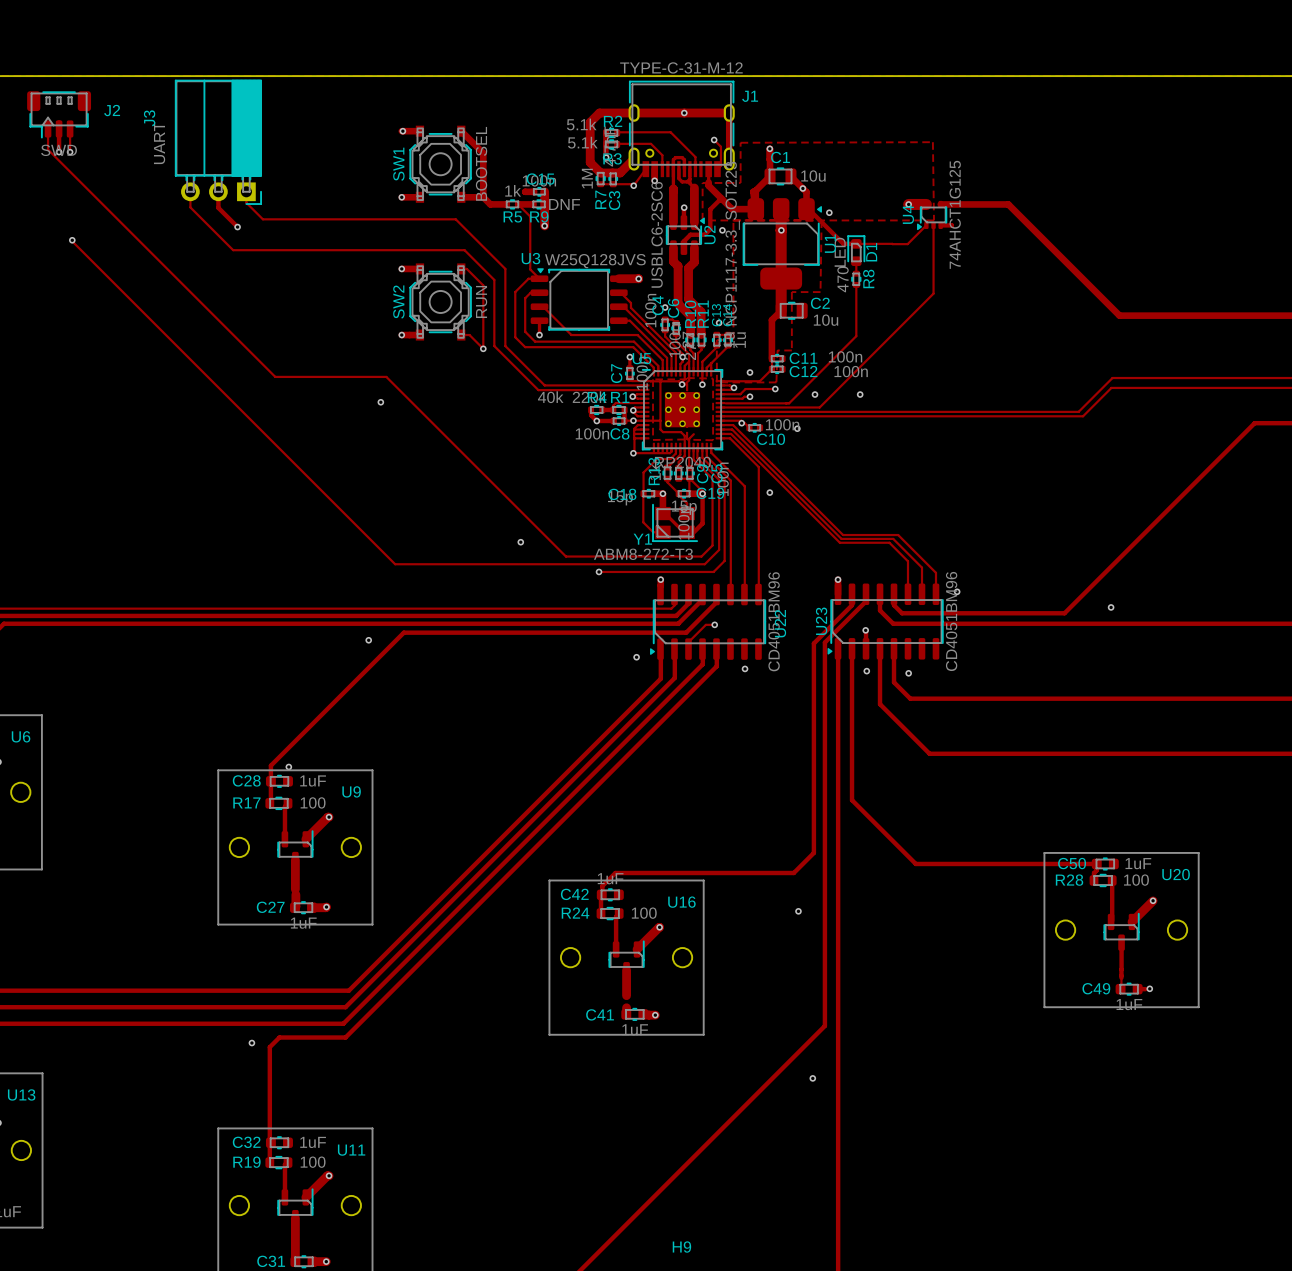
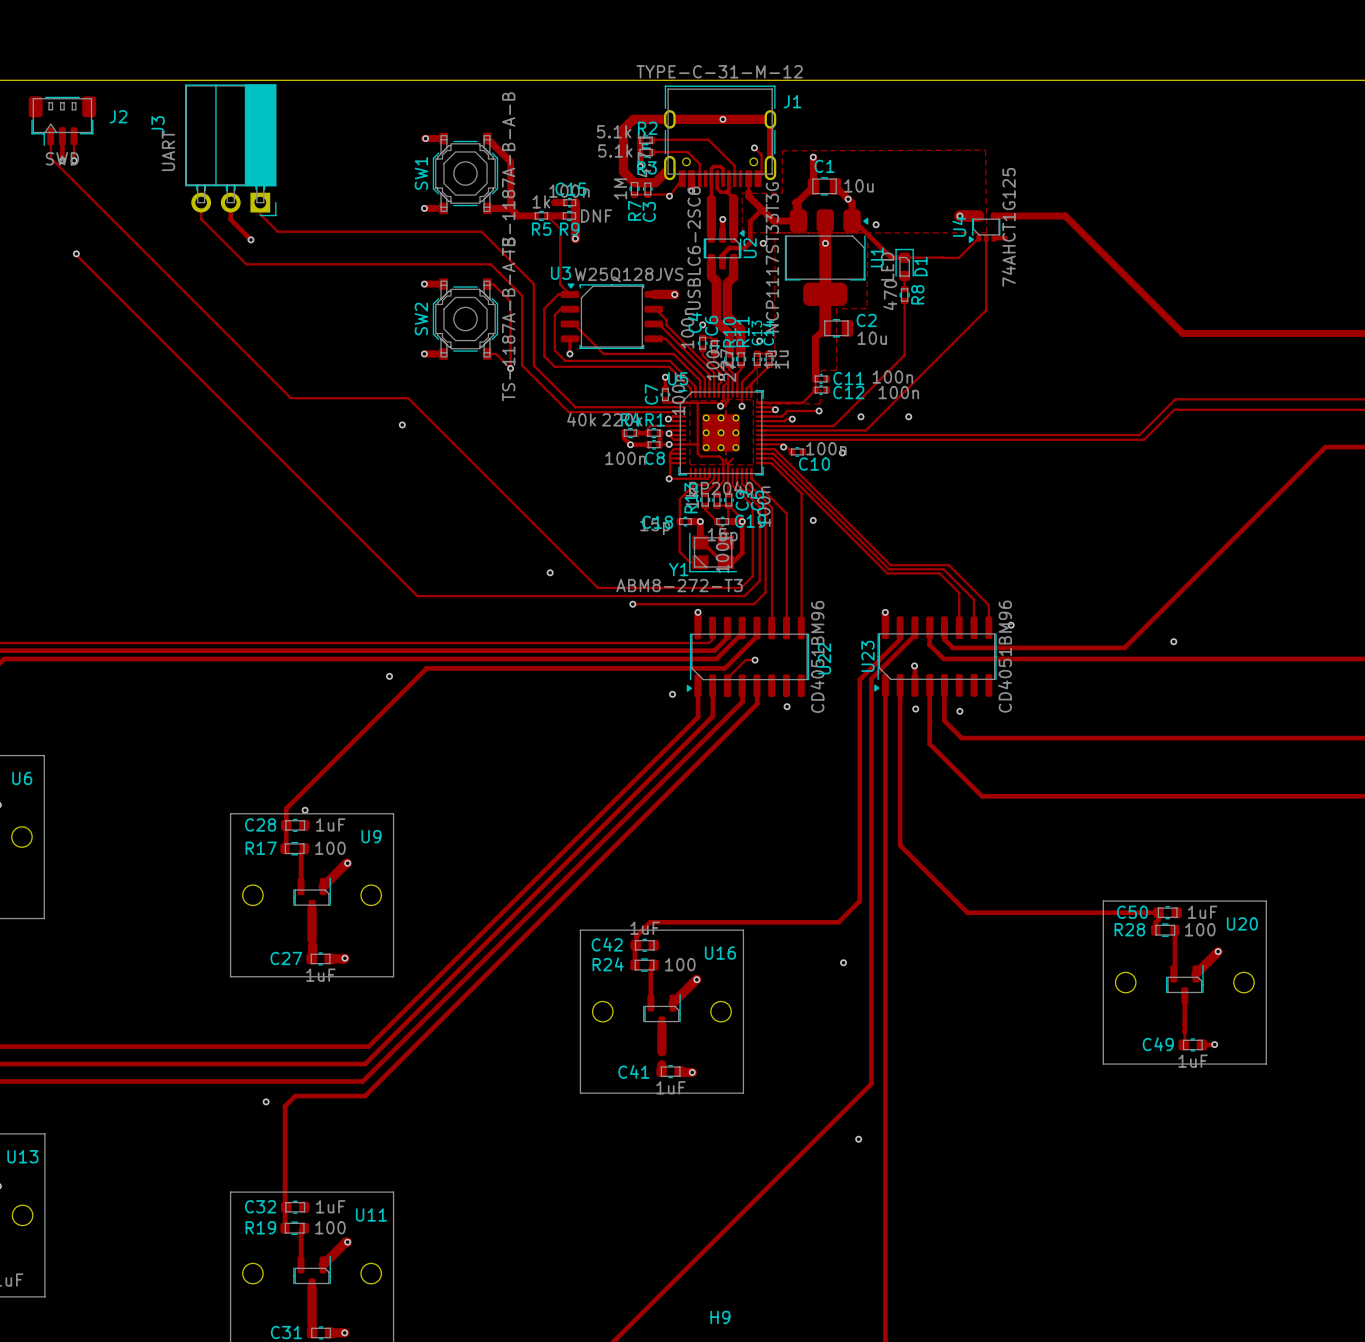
SW1 value: BOOTSEL (481, 163) -> TS-1187A-B-A-B (508, 174)
U1 value: NCP1117-3.3_SOT223 (732, 243) -> NCP1117ST33T3G (772, 257)
SW2 value: RUN (481, 301) -> TS-1187A-B-A-B (508, 319)
via: (749, 372) -> none

